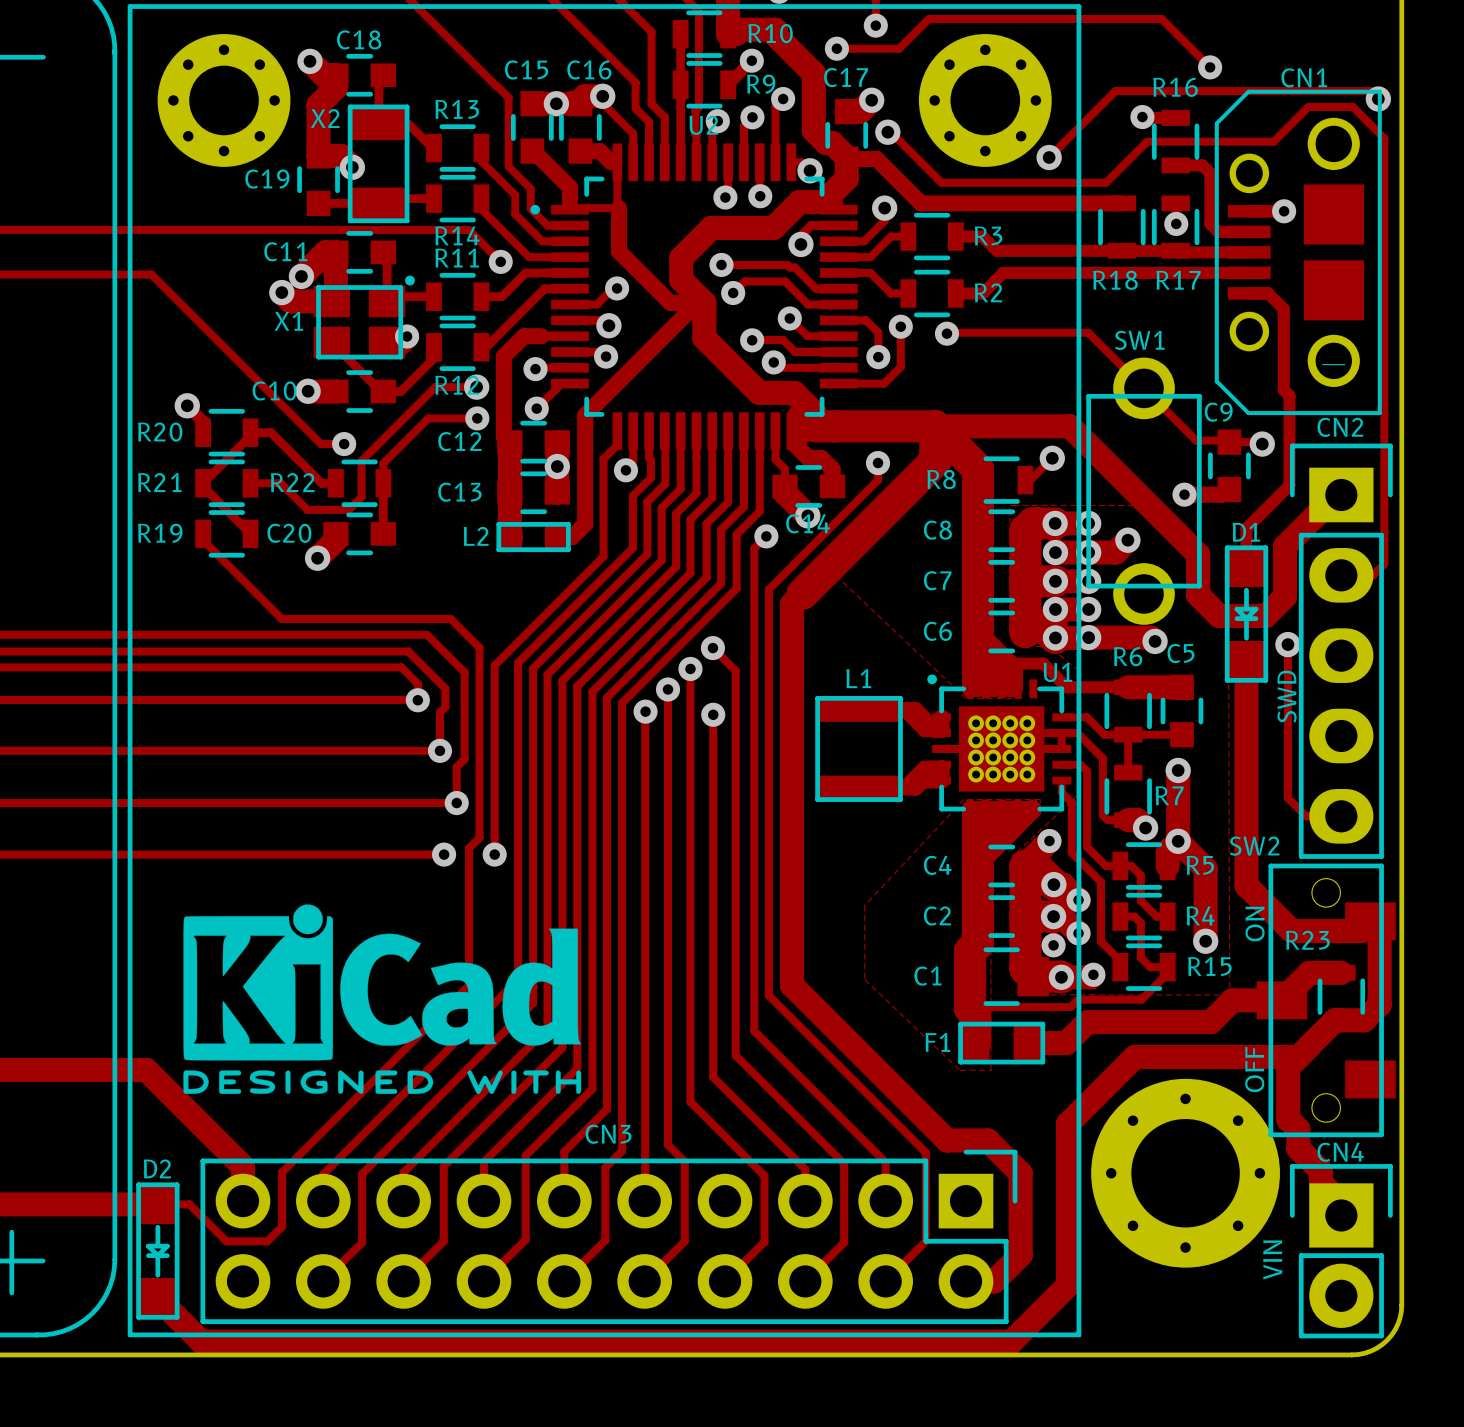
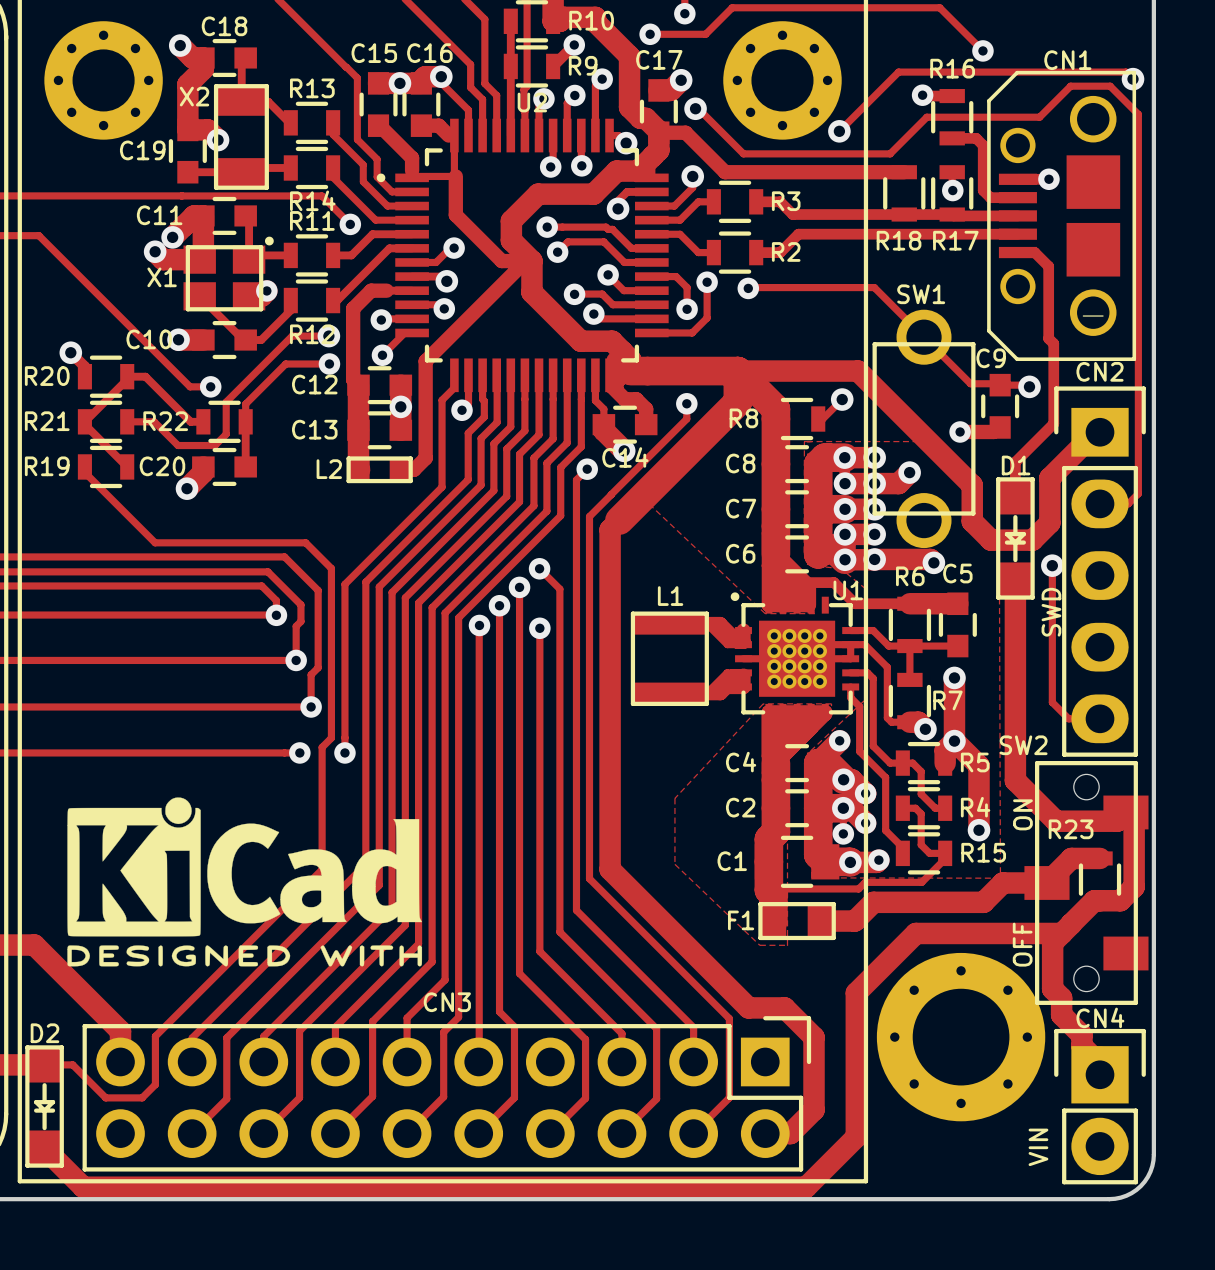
text position: VIN (1272, 1259) -> VIN (1038, 1147)

